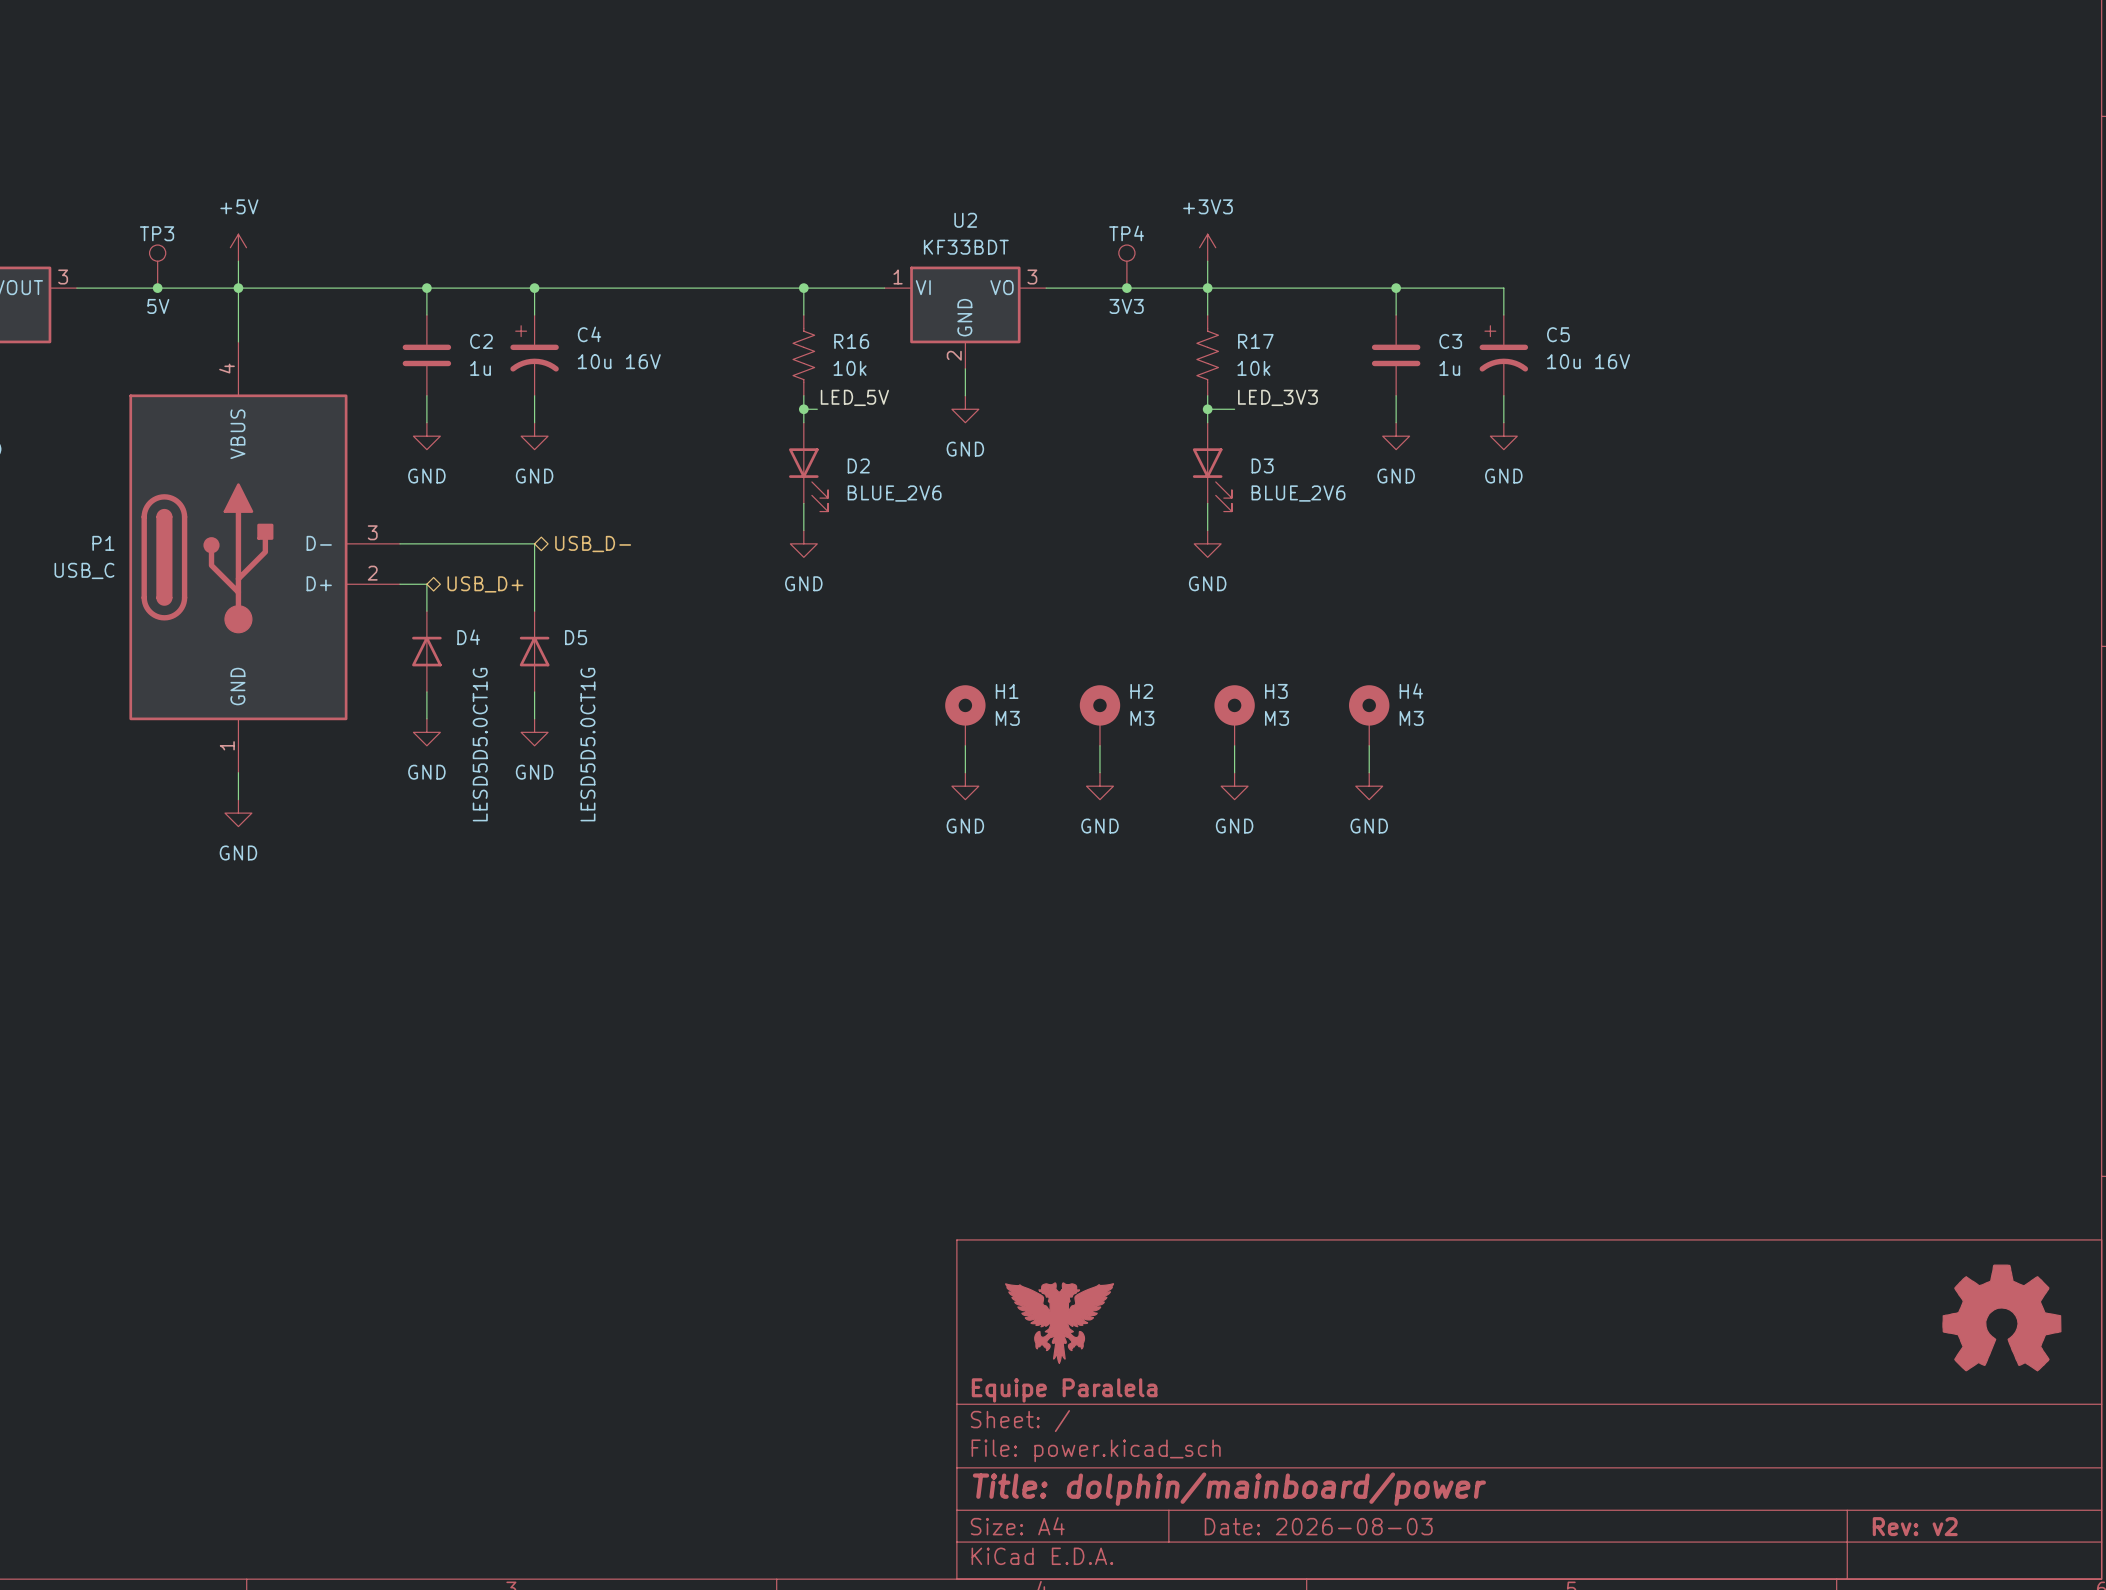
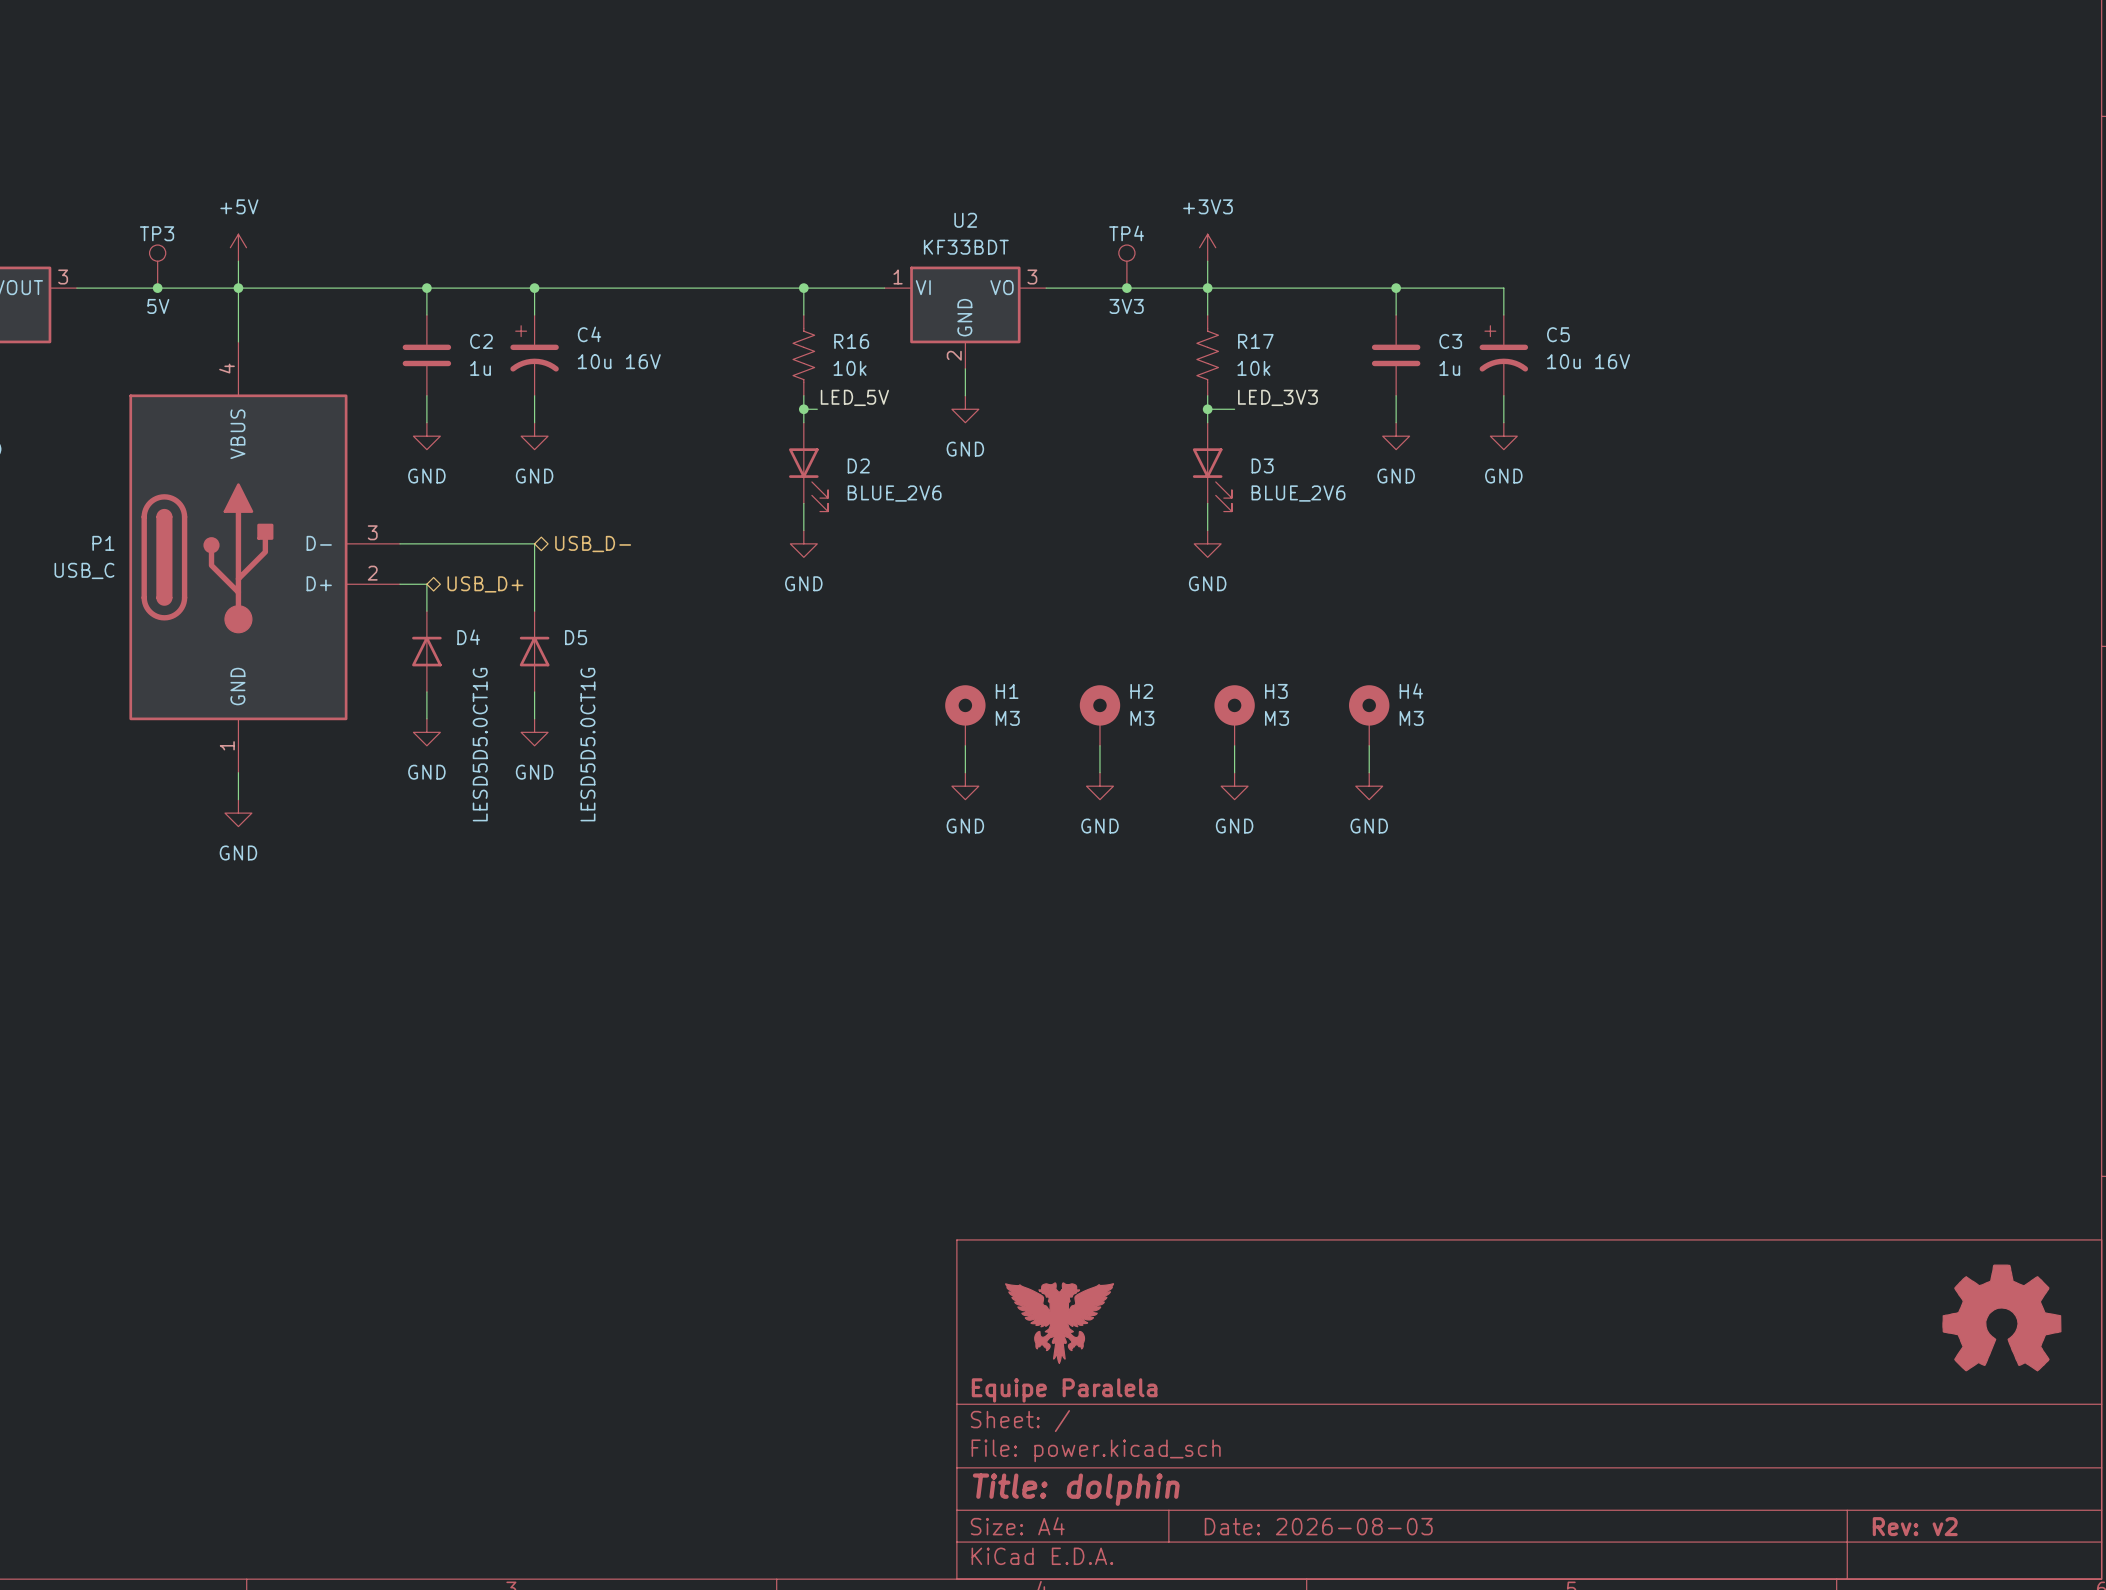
title block: Title: dolphin/mainboard/power (1229, 1489) -> Title: dolphin (1076, 1489)

